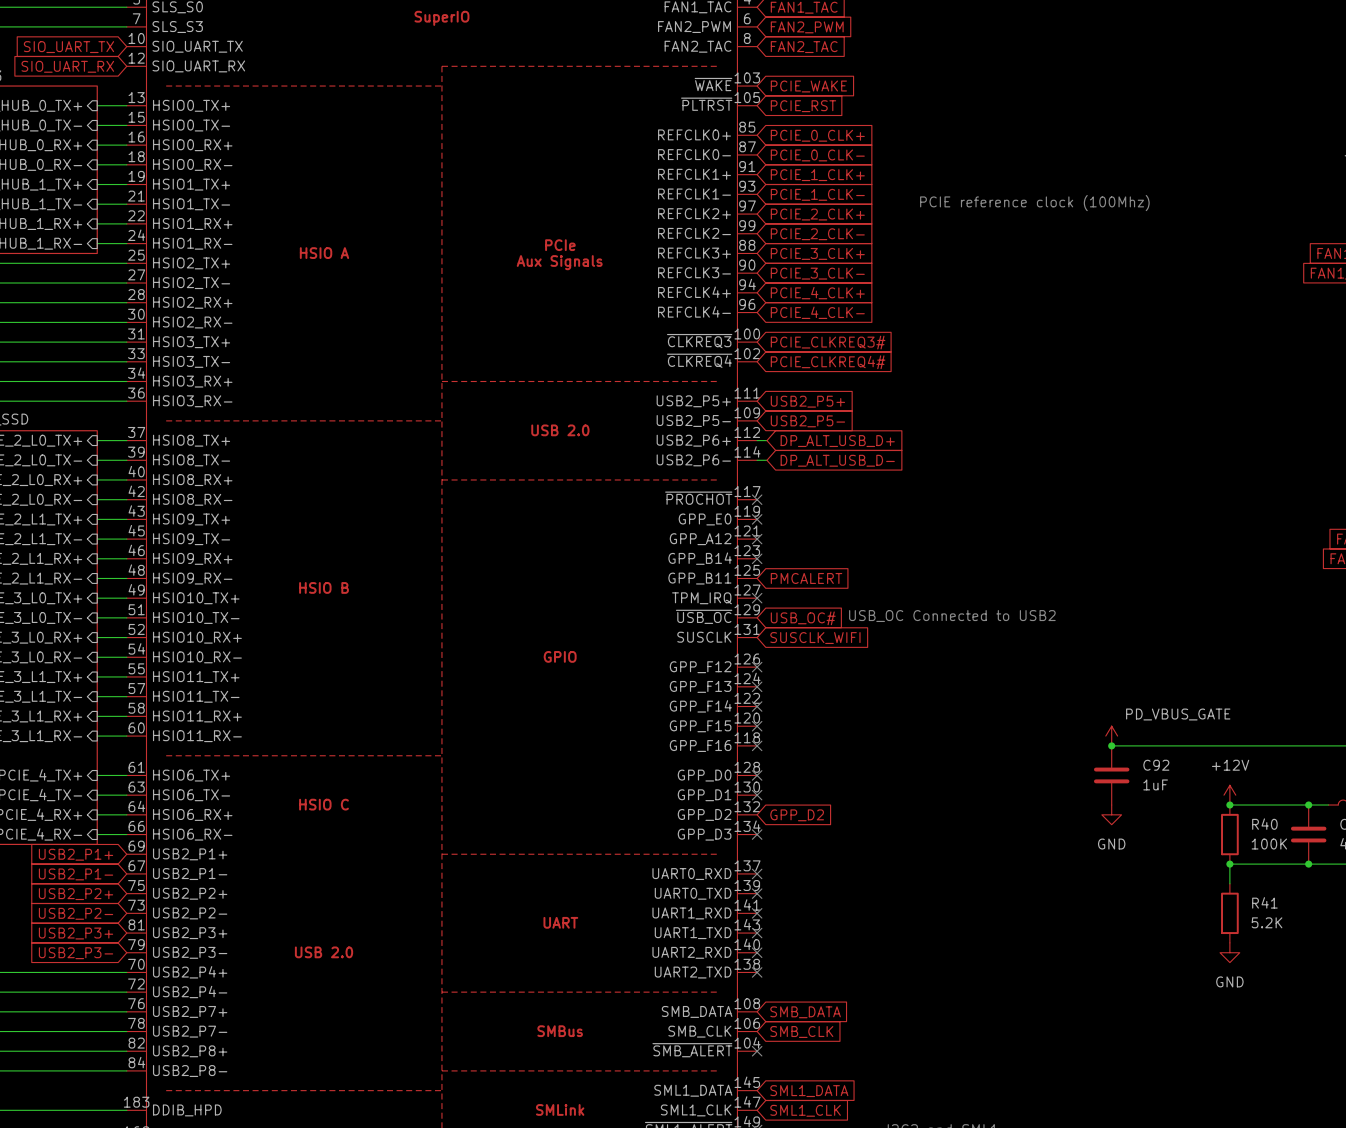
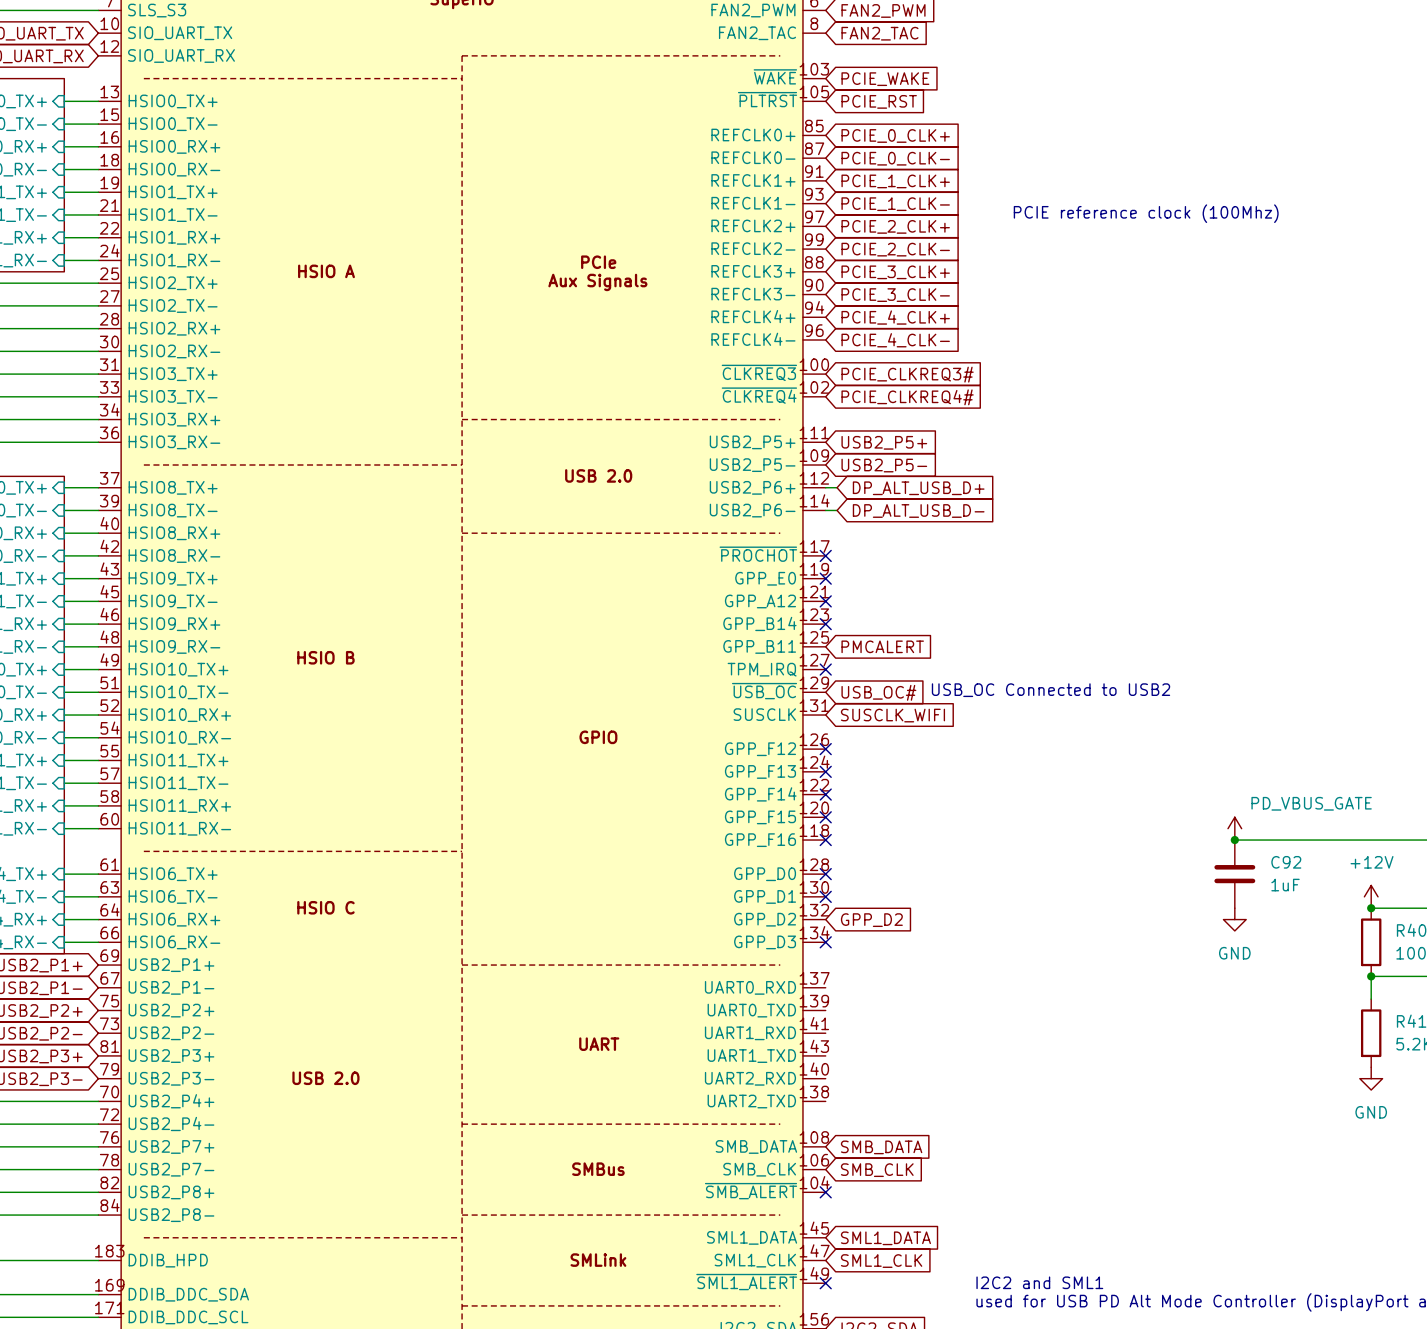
no-connect mark: (757, 873) -> none
no-connect mark: (757, 893) -> none
no-connect mark: (757, 913) -> none
no-connect mark: (757, 933) -> none
no-connect mark: (757, 952) -> none
no-connect mark: (757, 972) -> none

